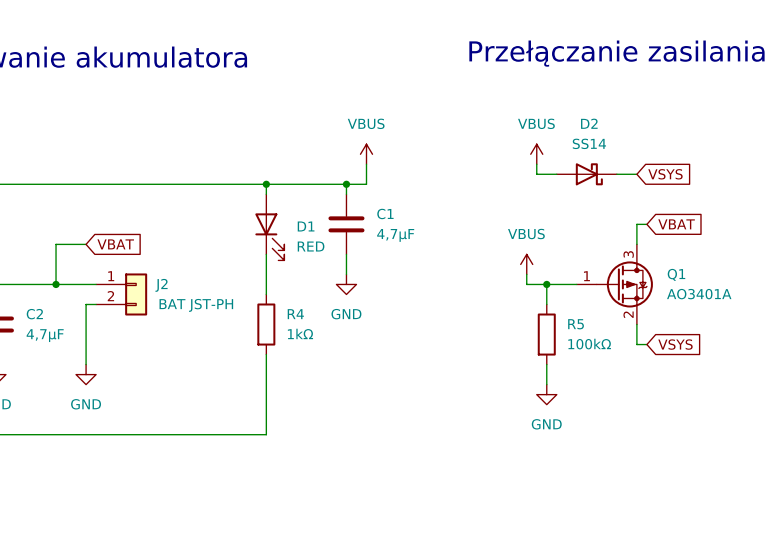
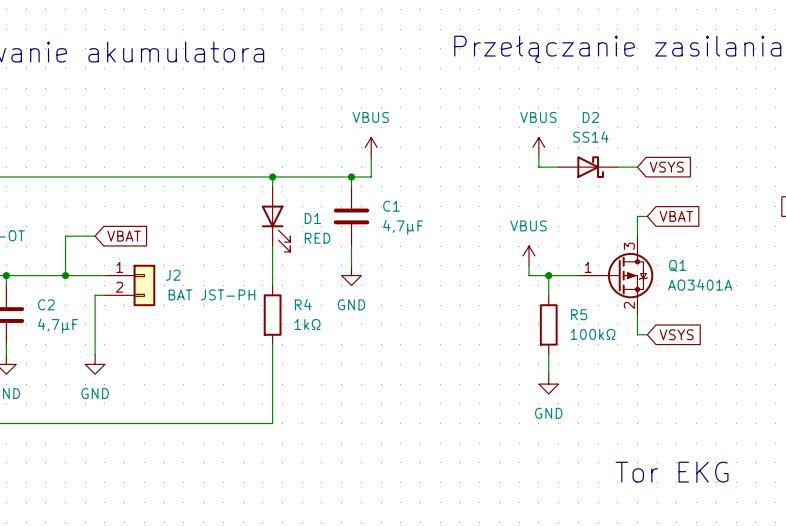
text: none -> Tor EKG (672, 472)

